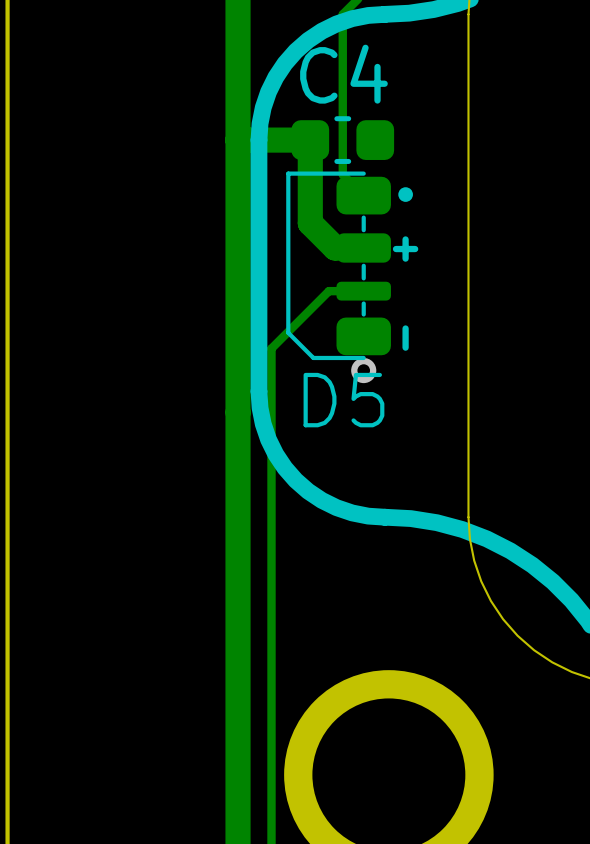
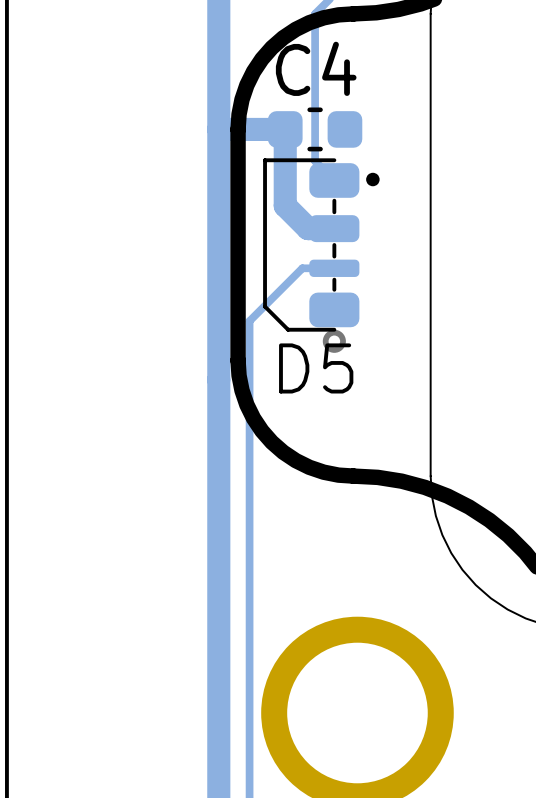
D5 text: + (405, 249) -> none
D5 text: - (405, 338) -> none

